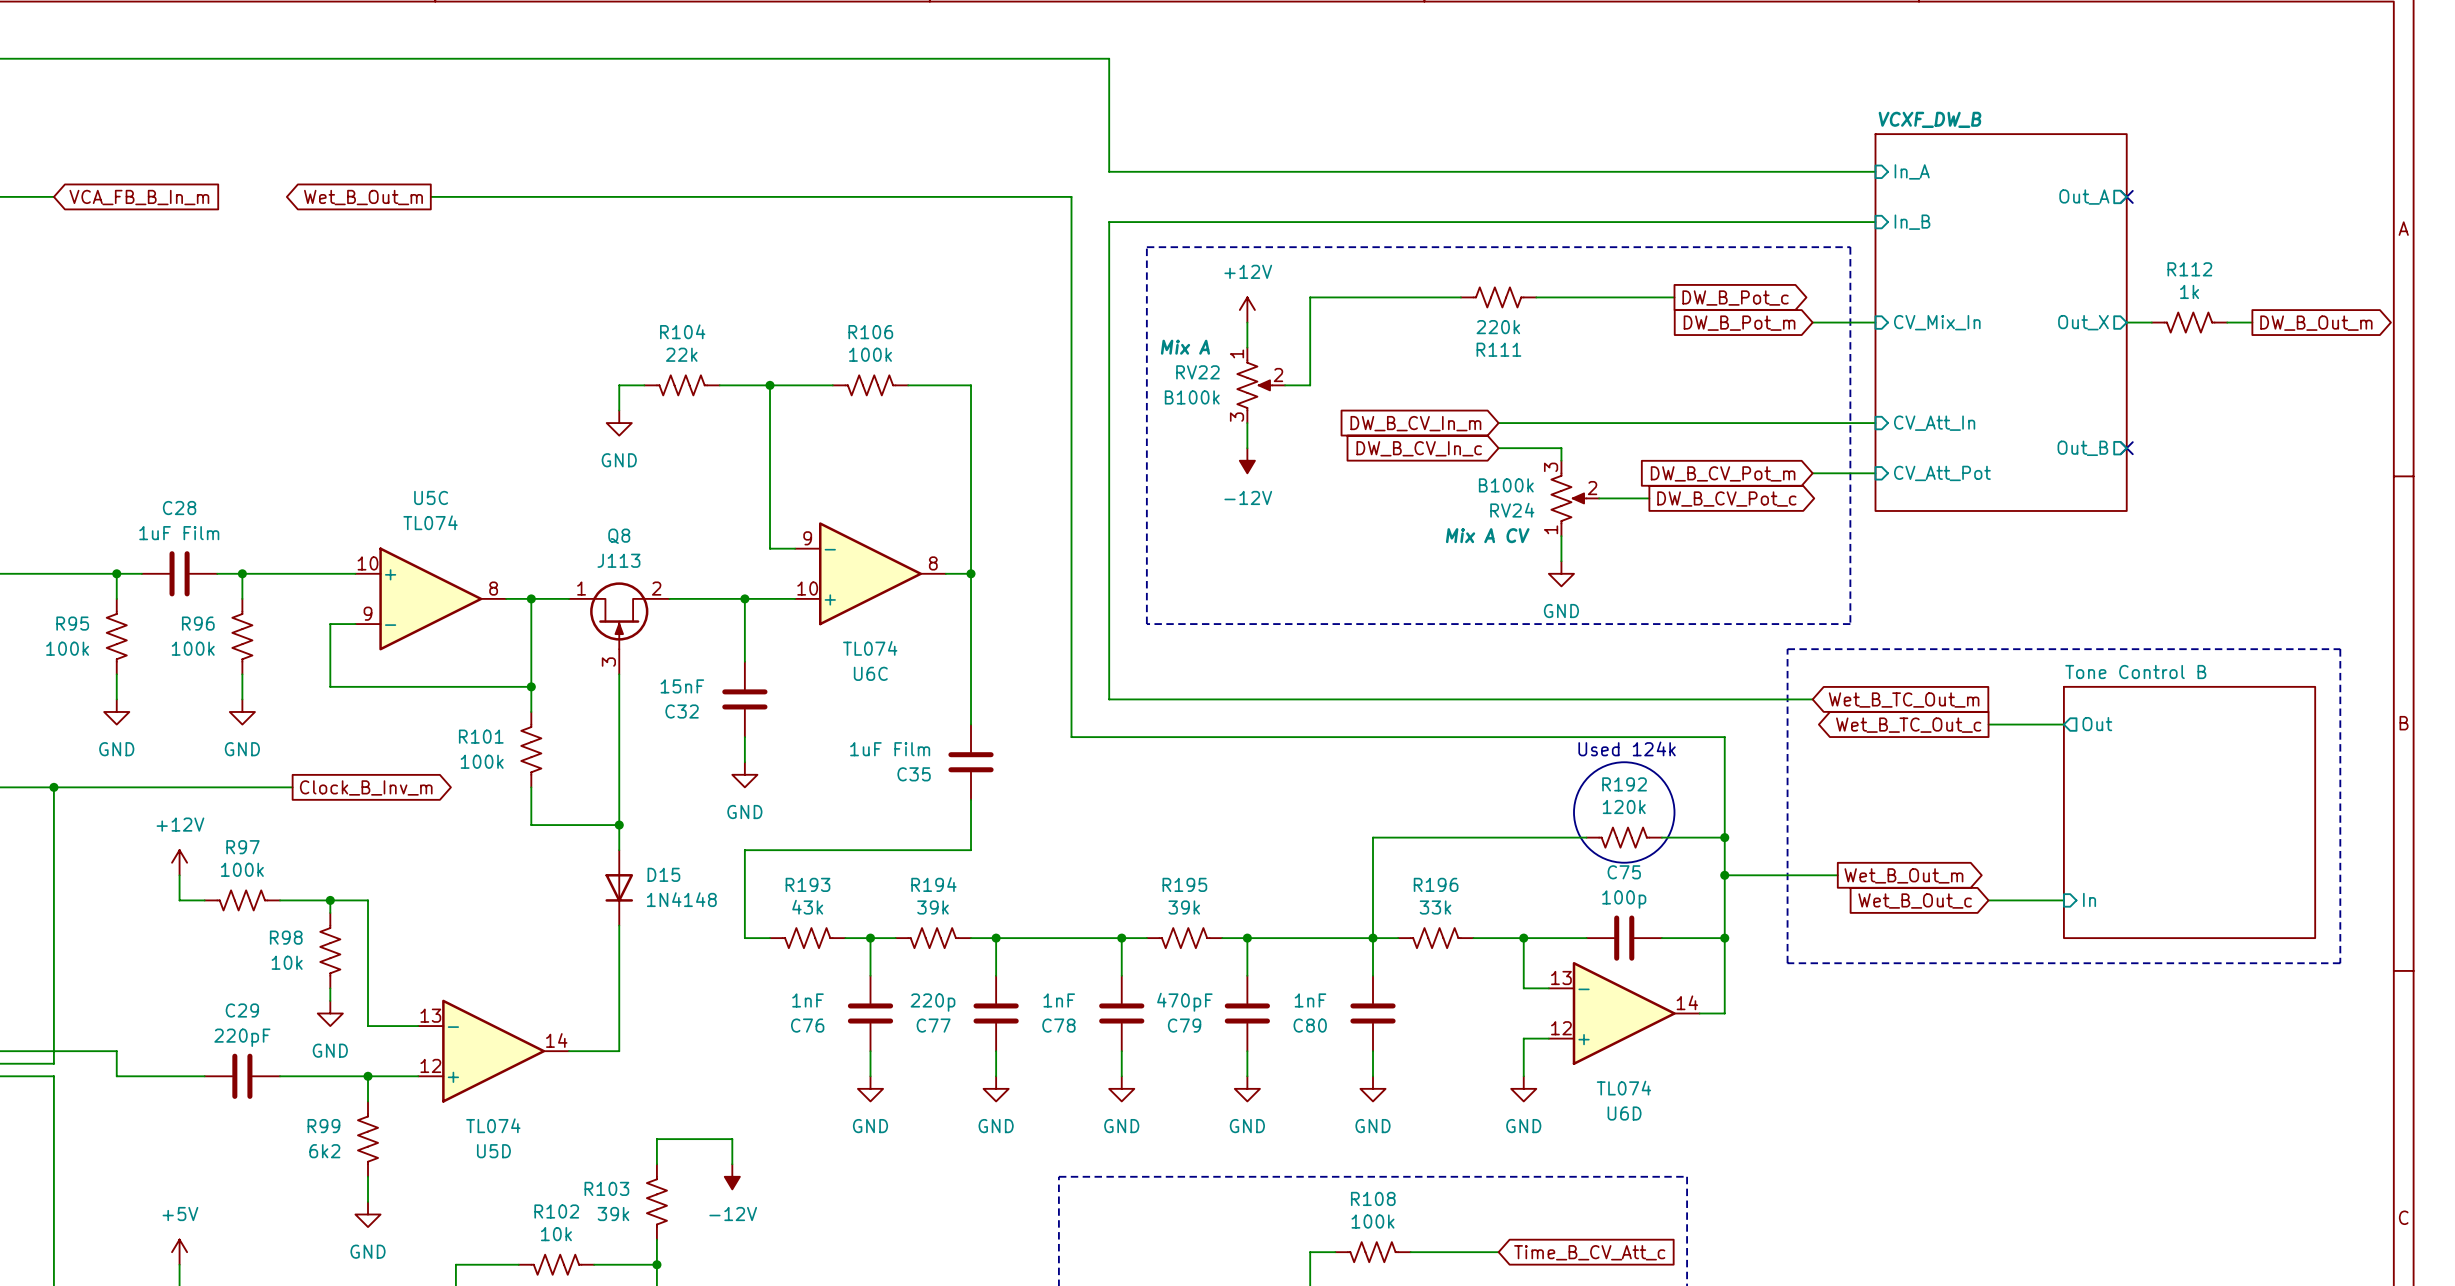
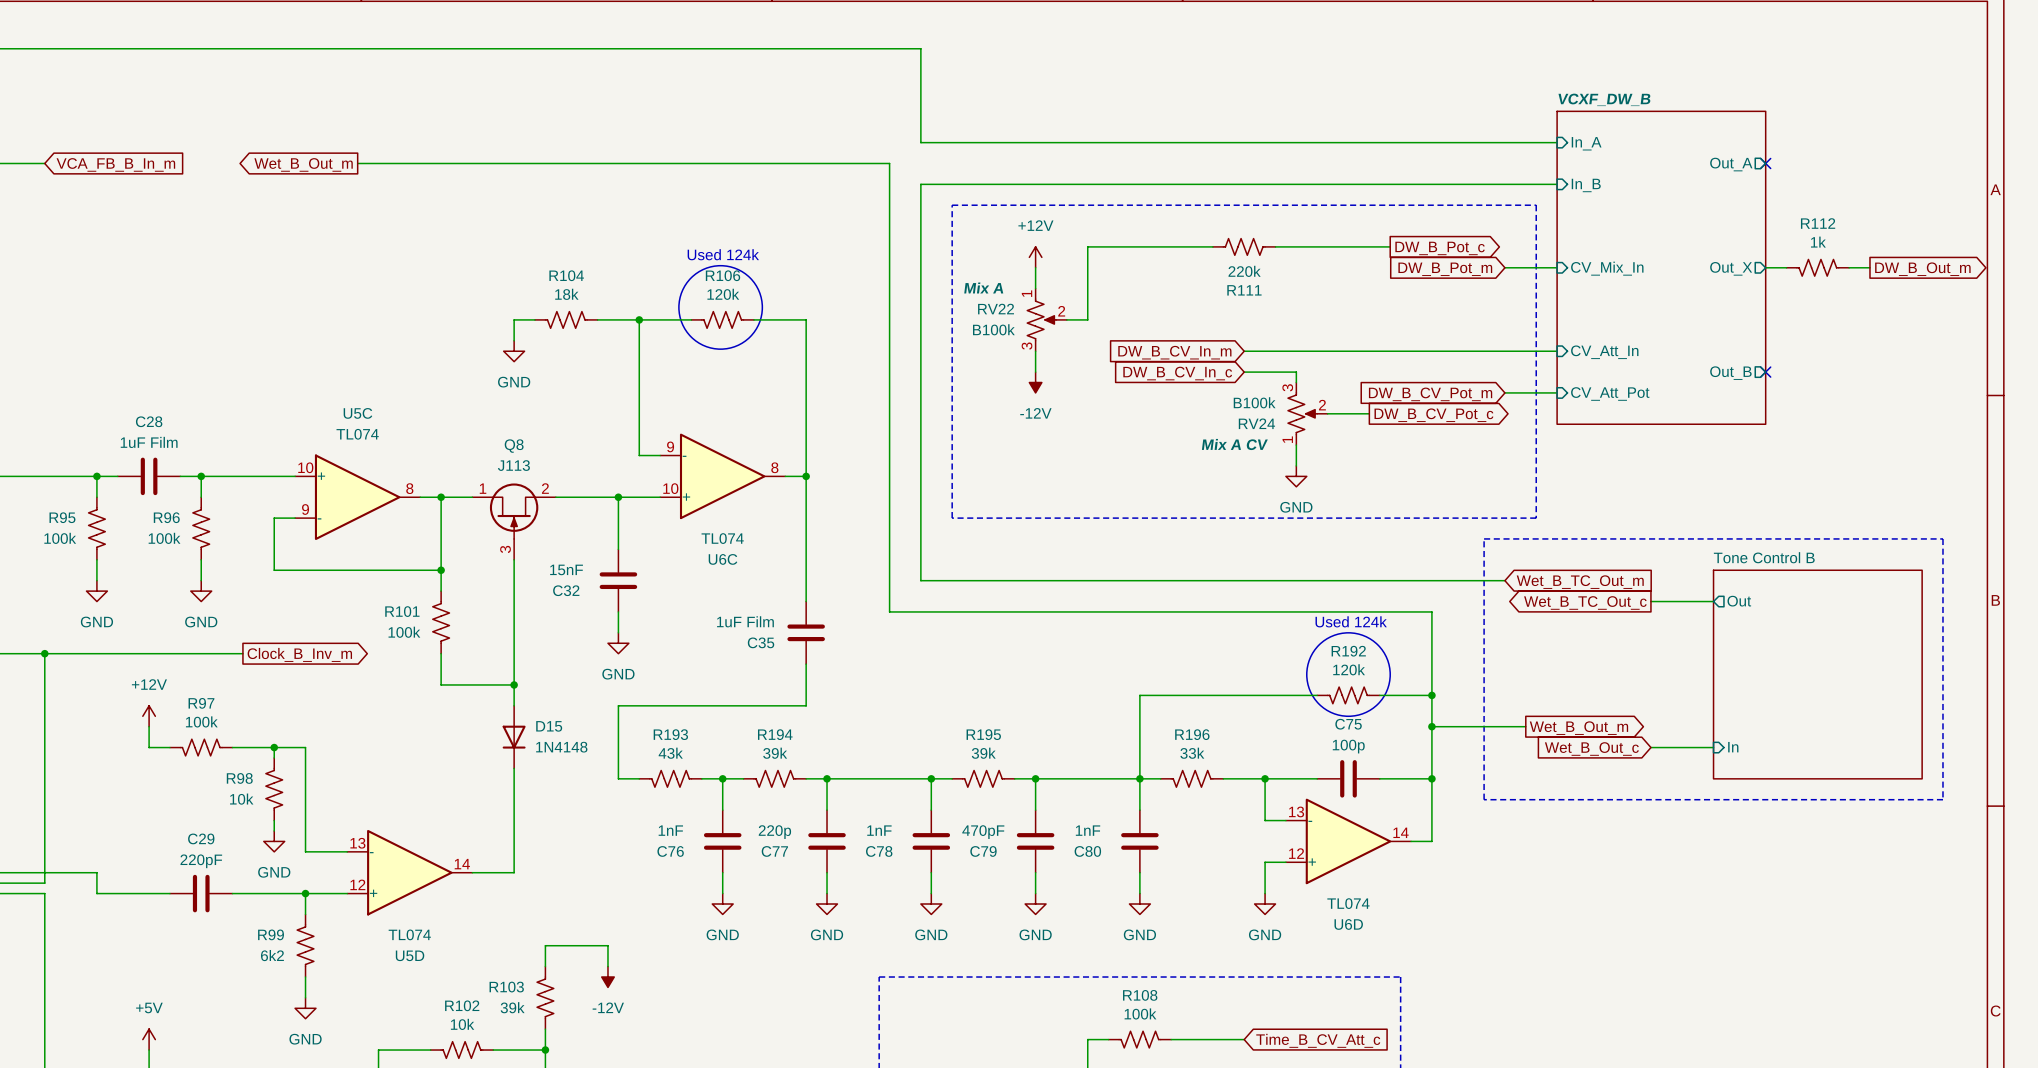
text: none -> Used 124k (723, 254)
drawing: none -> [678, 265, 763, 350]
R104 value: 22k (681, 354) -> 18k (566, 294)
R106 value: 100k (870, 354) -> 120k (723, 294)

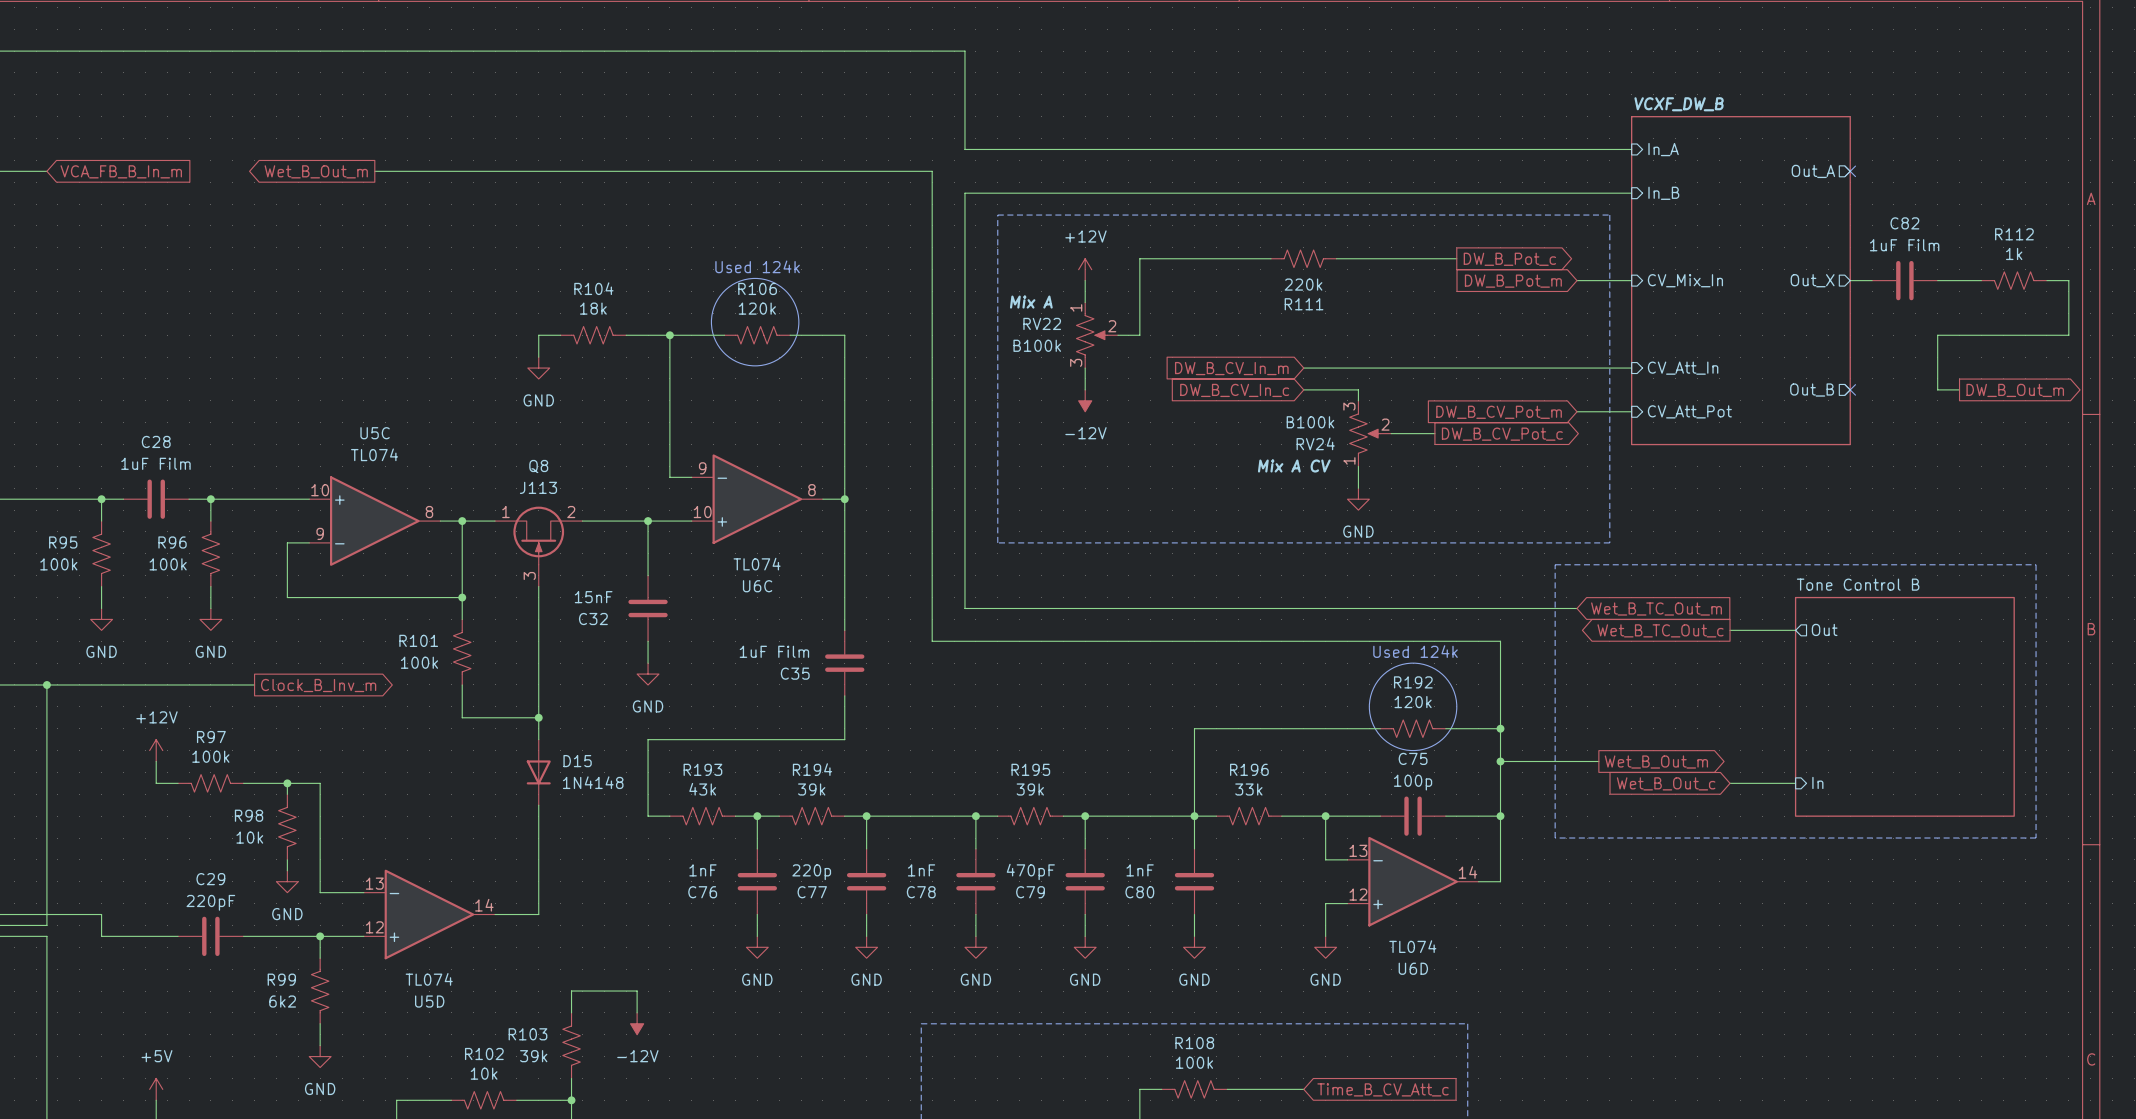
R112 position: (1817, 267) -> (2014, 280)
C82: none -> 1uF Film (1904, 280)
wire: none -> (1959, 280) (1981, 280)
wire: none -> (2046, 280) (2068, 280) (2068, 335) (1937, 335) (1937, 389) (1959, 389)
global label position: DW_B_Out_m (1922, 269) -> DW_B_Out_m (2015, 390)

